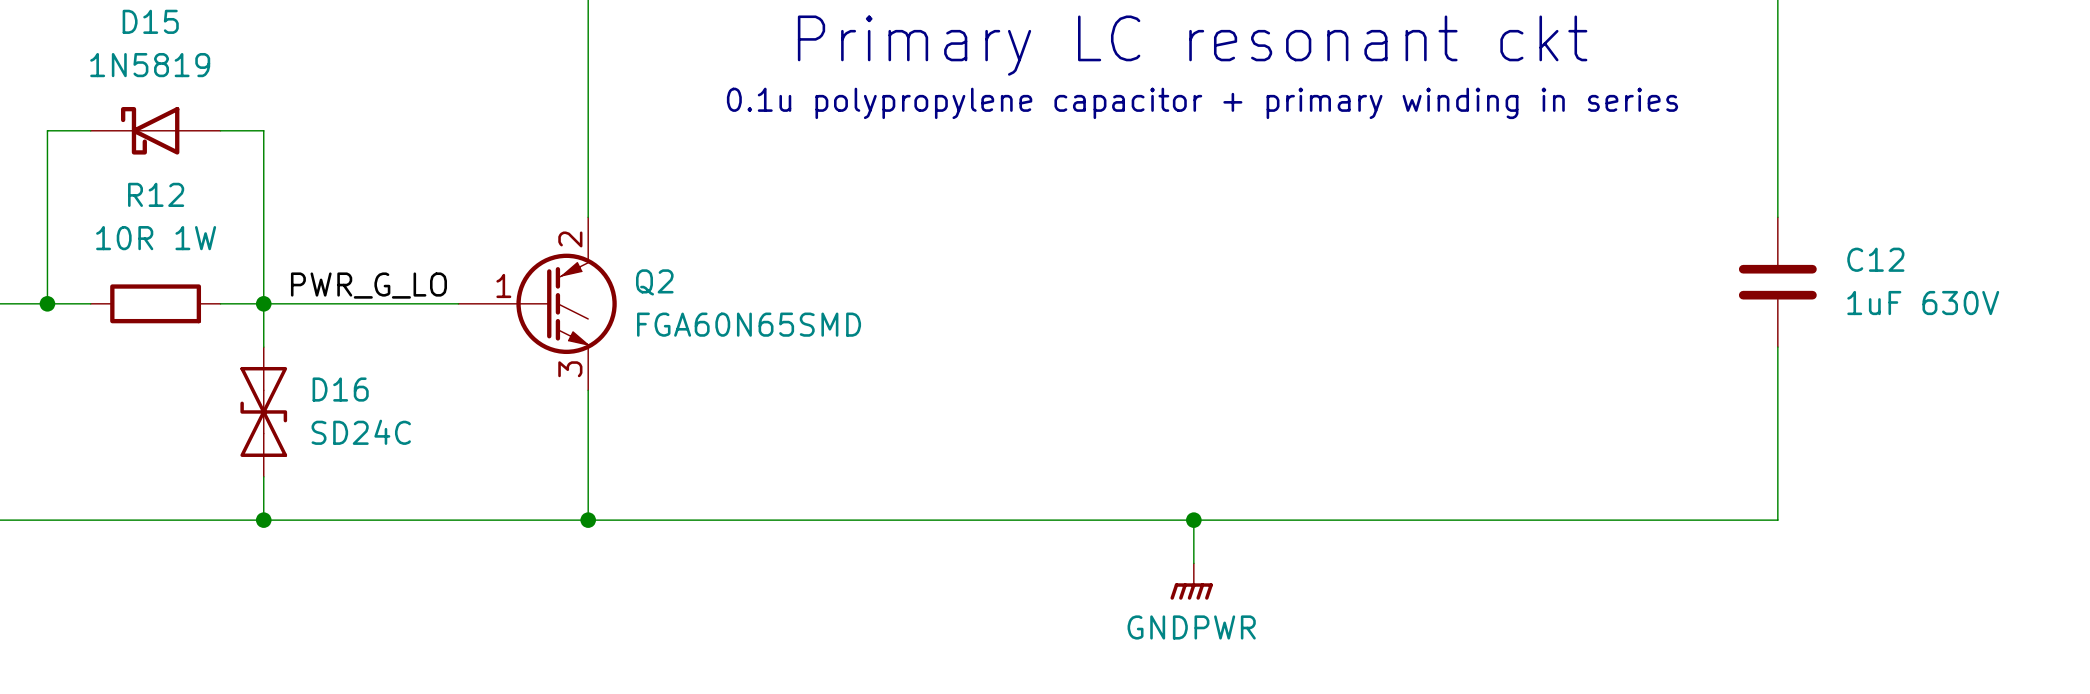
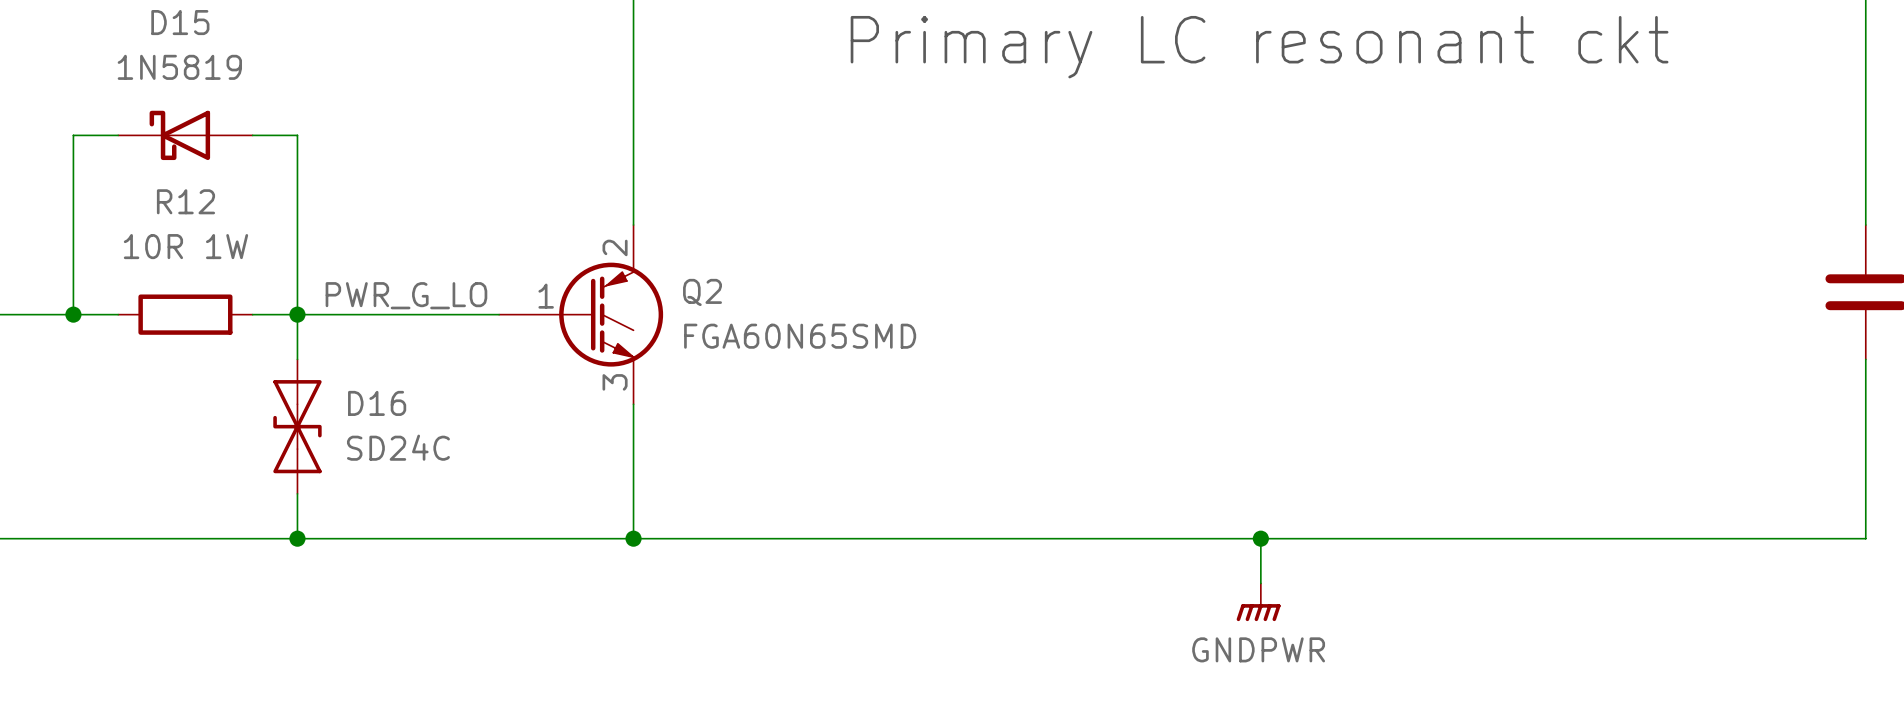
text: 0.1u polypropylene capacitor + primary winding in series (1202, 103) -> none

